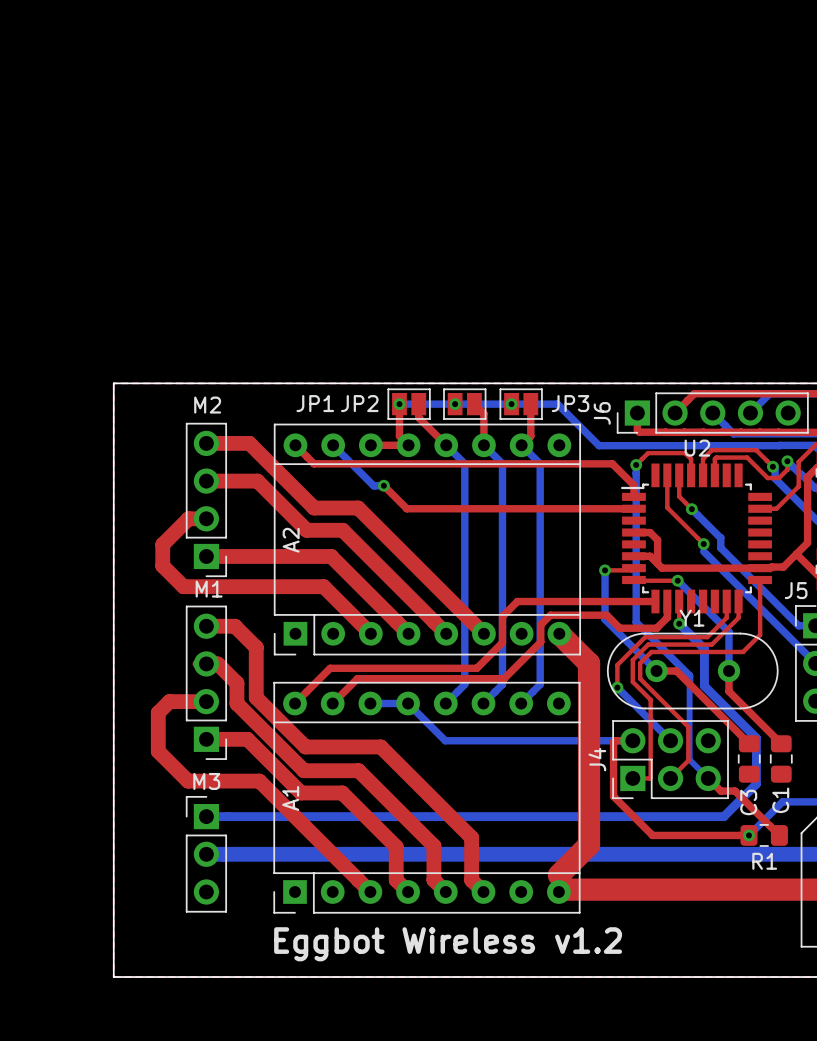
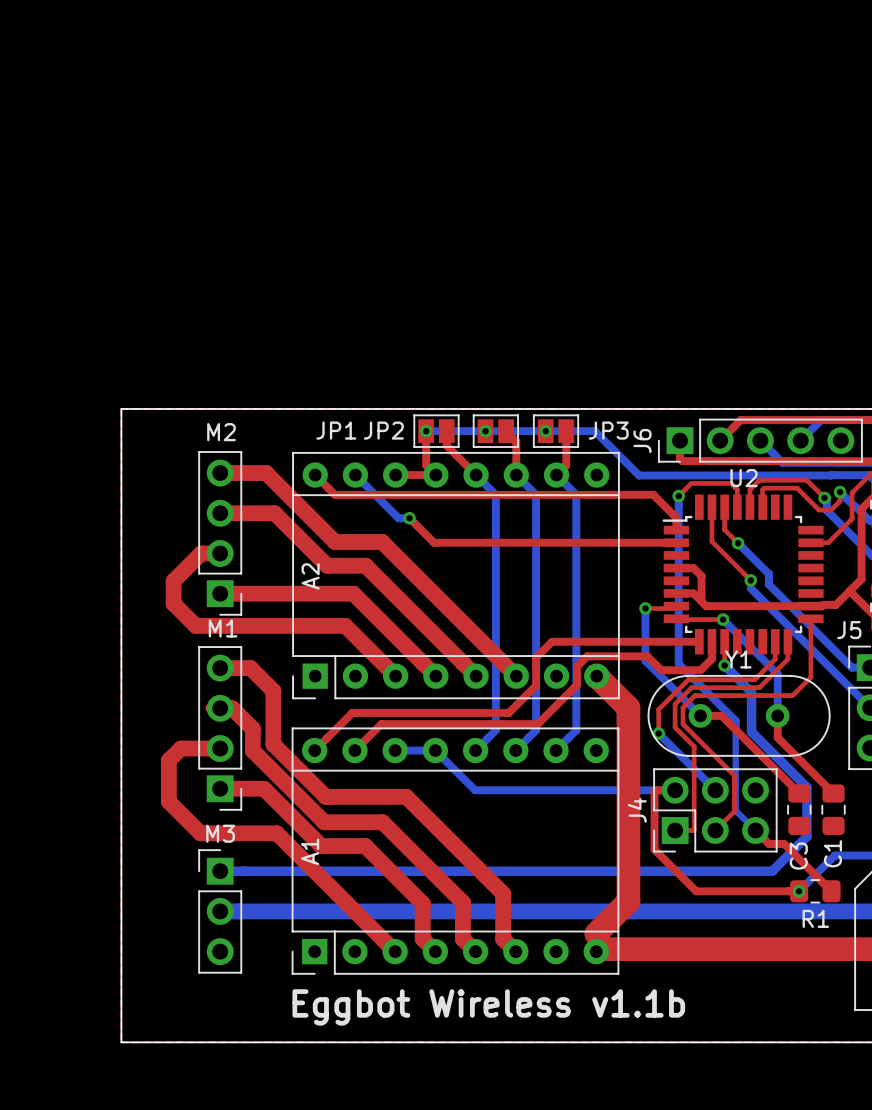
text: Eggbot Wireless v1.2 (448, 944) -> Eggbot Wireless v1.1b (488, 1007)

